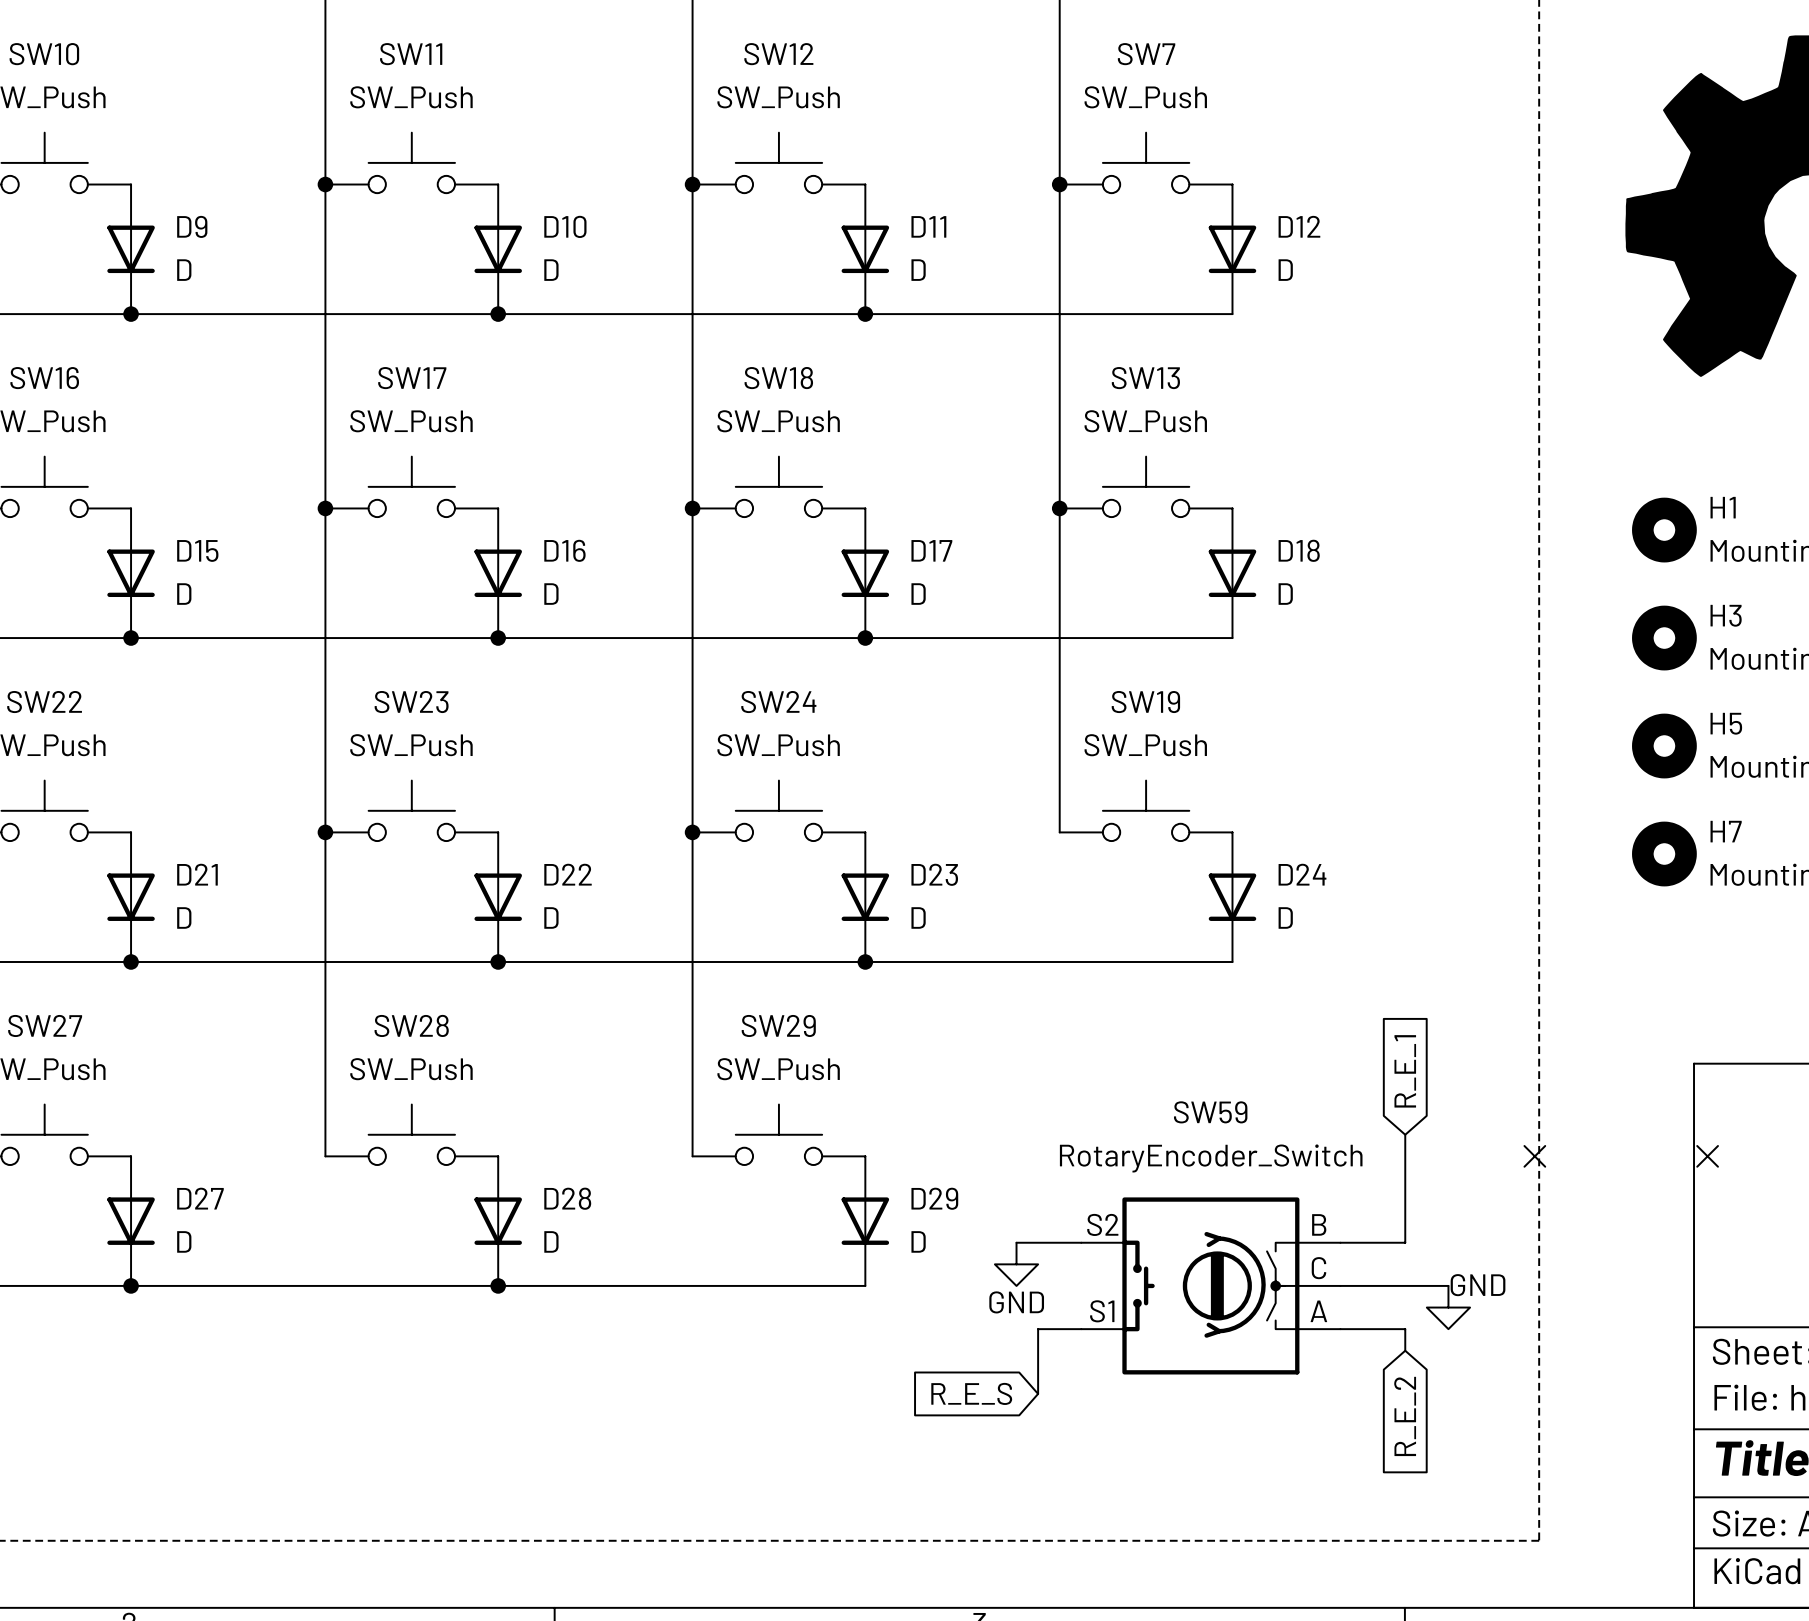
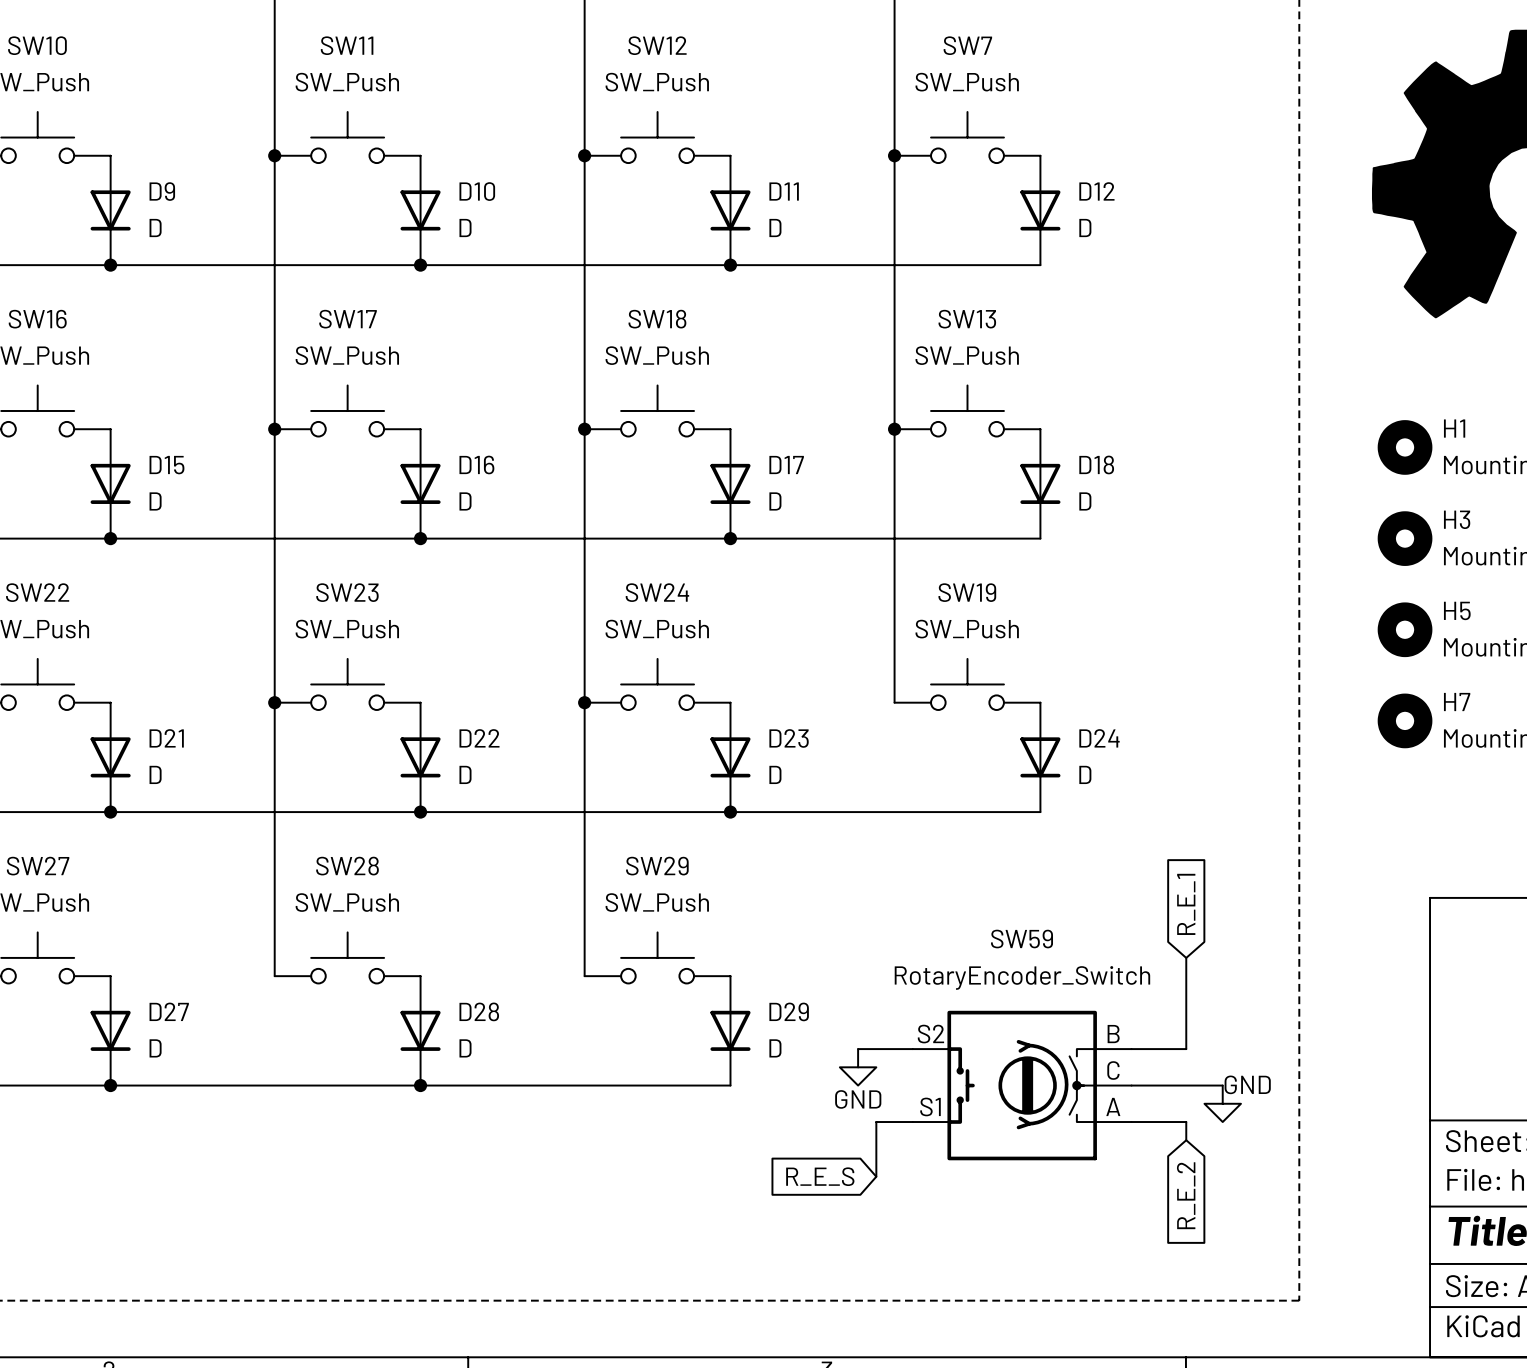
no-connect mark: (1534, 1156) -> none
no-connect mark: (1707, 1156) -> none

